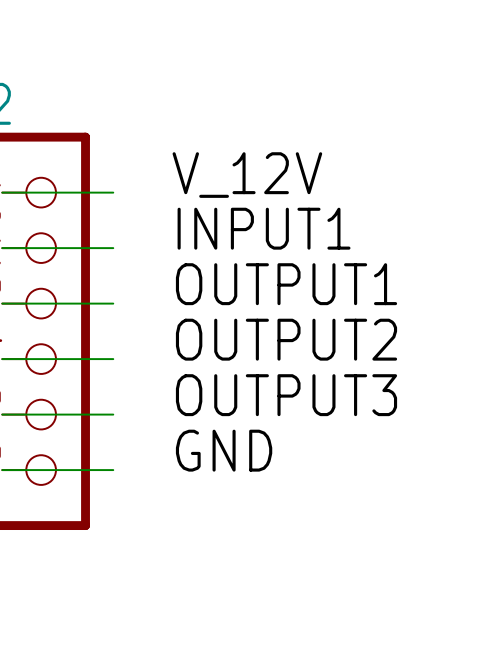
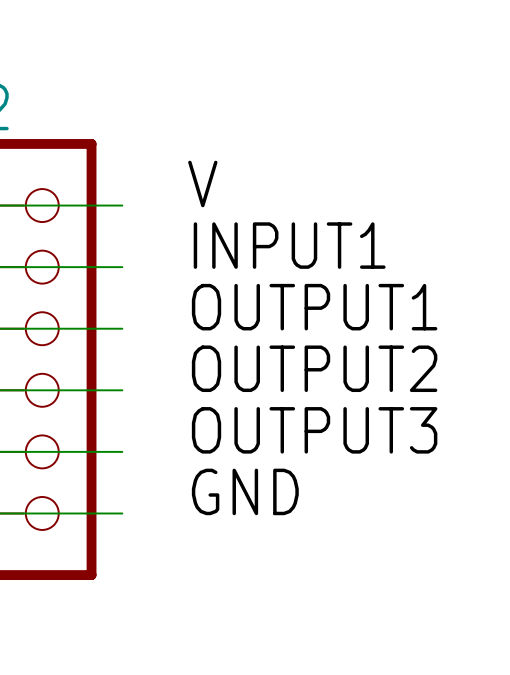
label: V_12V (247, 175) -> V (202, 183)

